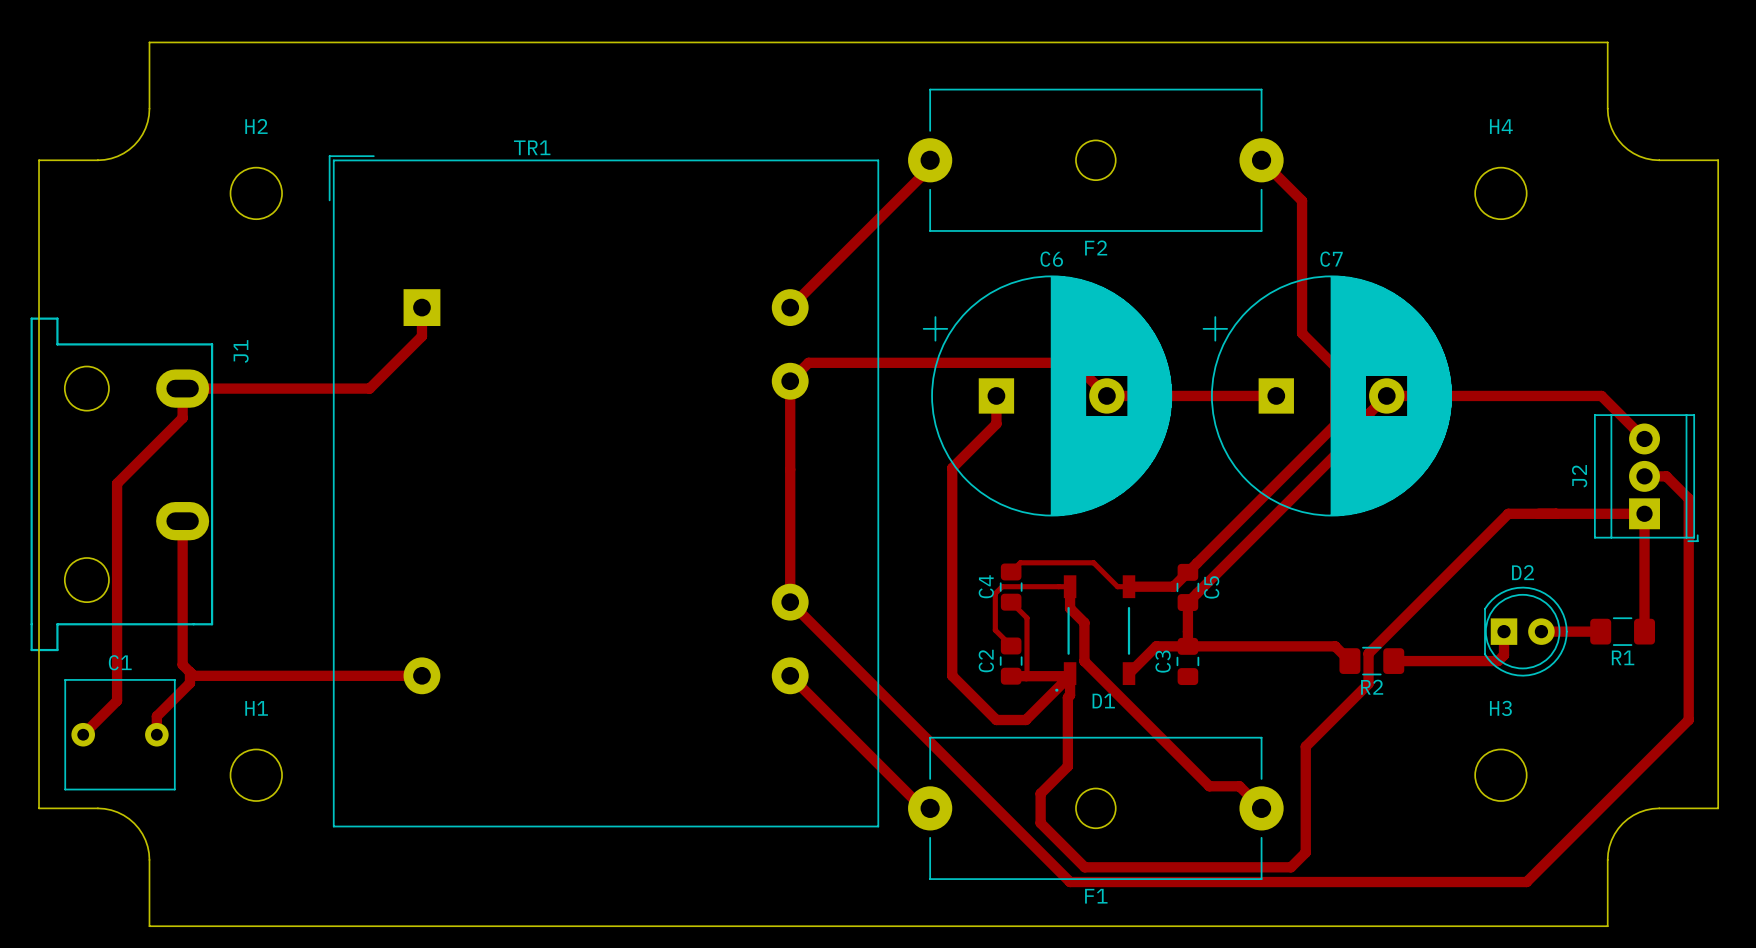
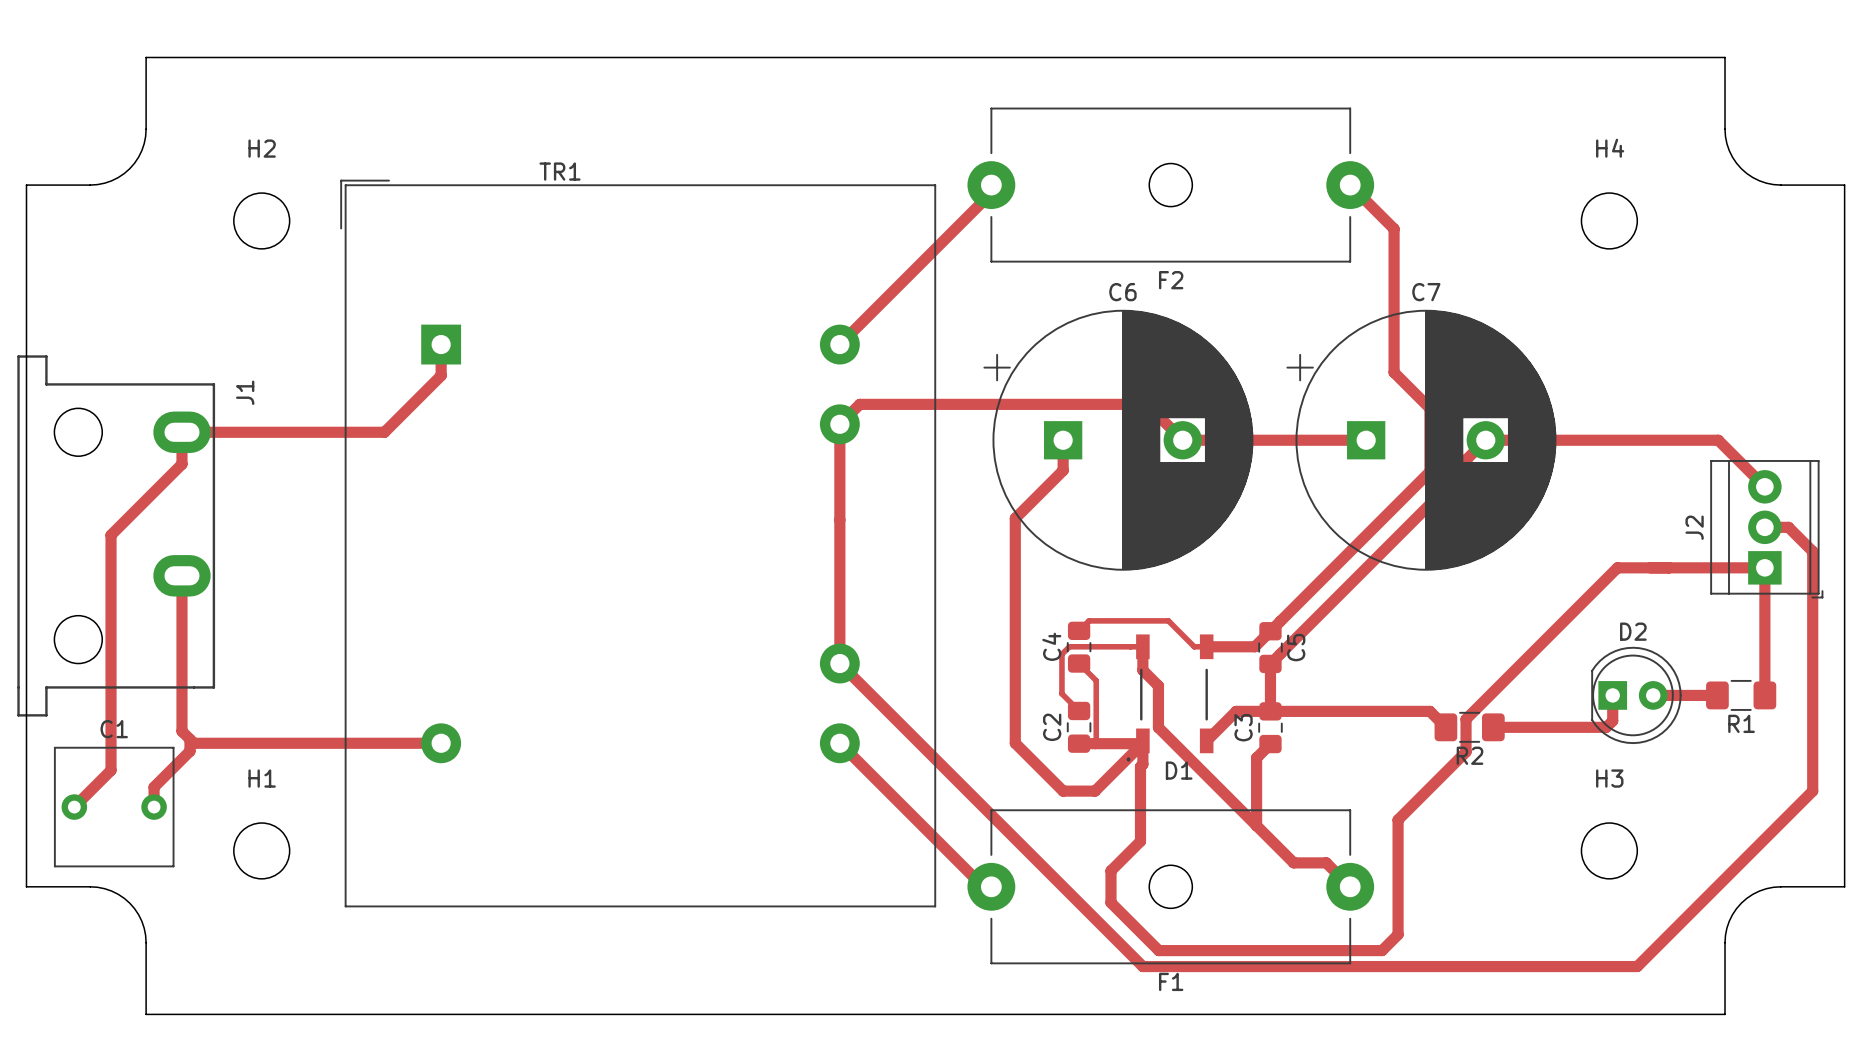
top track: none -> (1270, 744) (1256, 757) (1256, 825)

